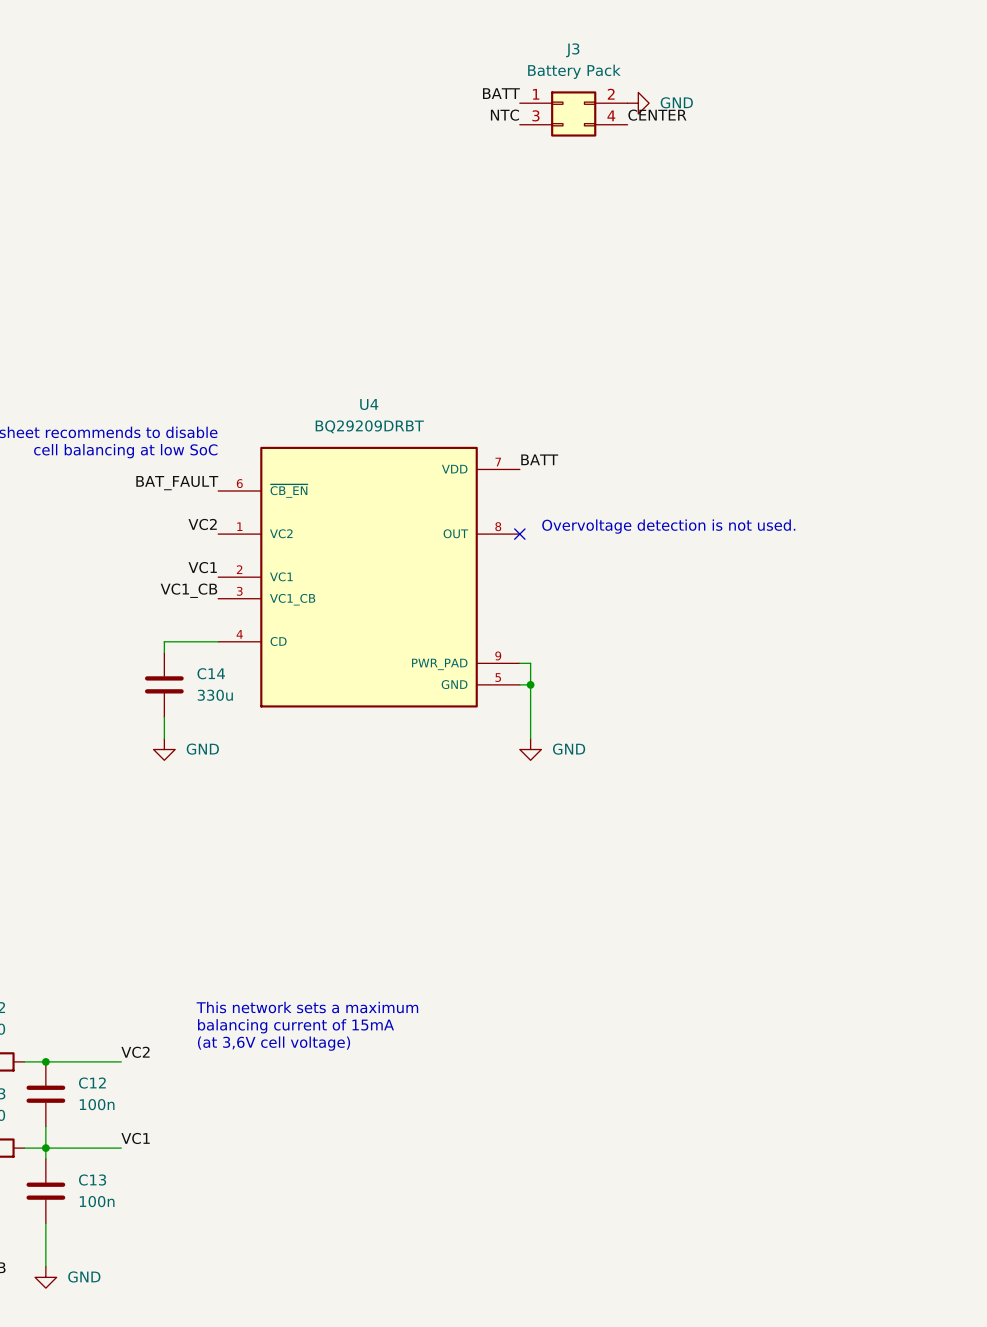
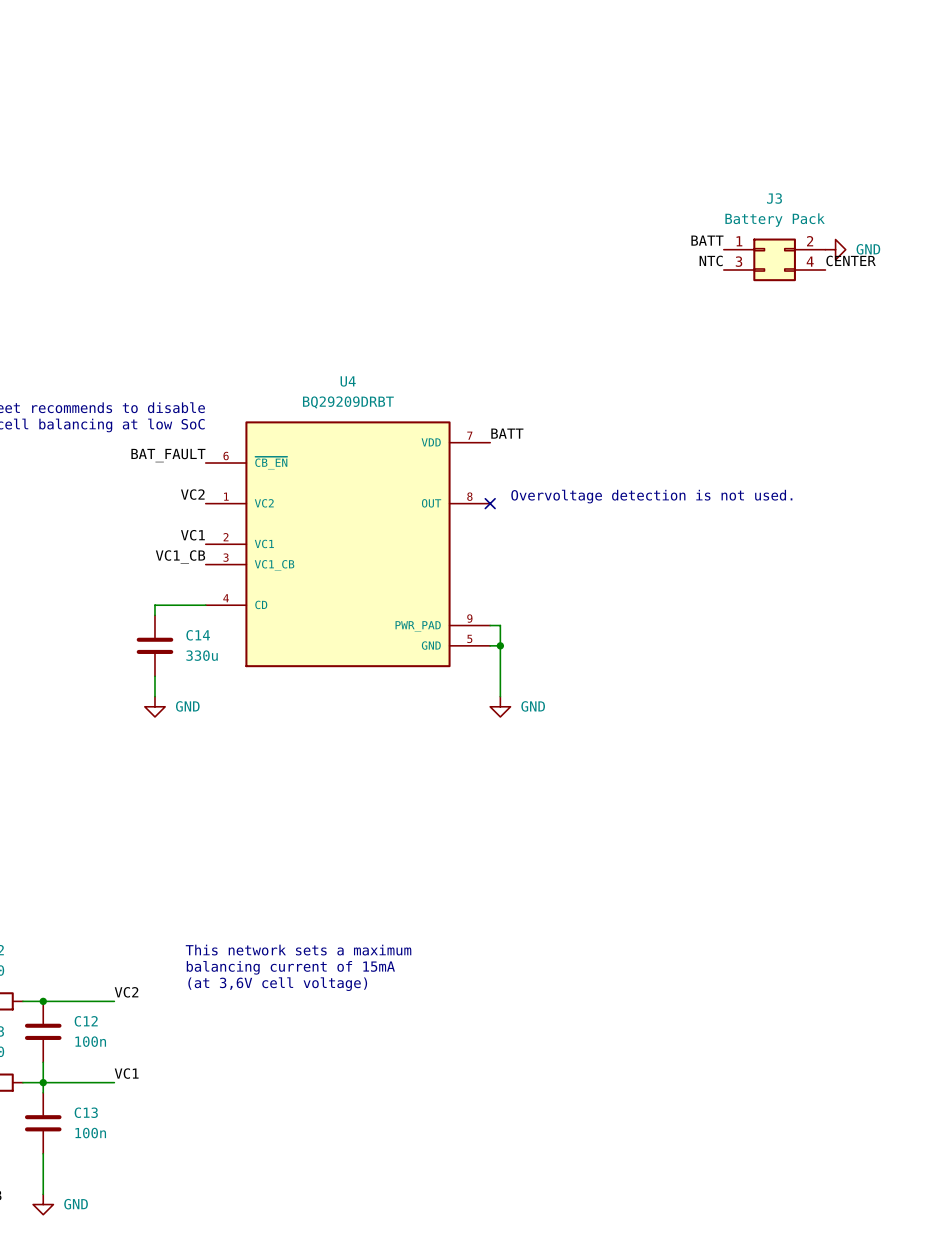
label: BATT (501, 93) -> none
power symbol: GND (638, 103) -> none
J3 position: (573, 113) -> (774, 259)
label: NTC (504, 115) -> none
label: CENTER (657, 115) -> none
label: none -> BATT (707, 240)
power symbol: none -> GND (835, 249)
label: none -> NTC (711, 260)
label: none -> CENTER (851, 260)

